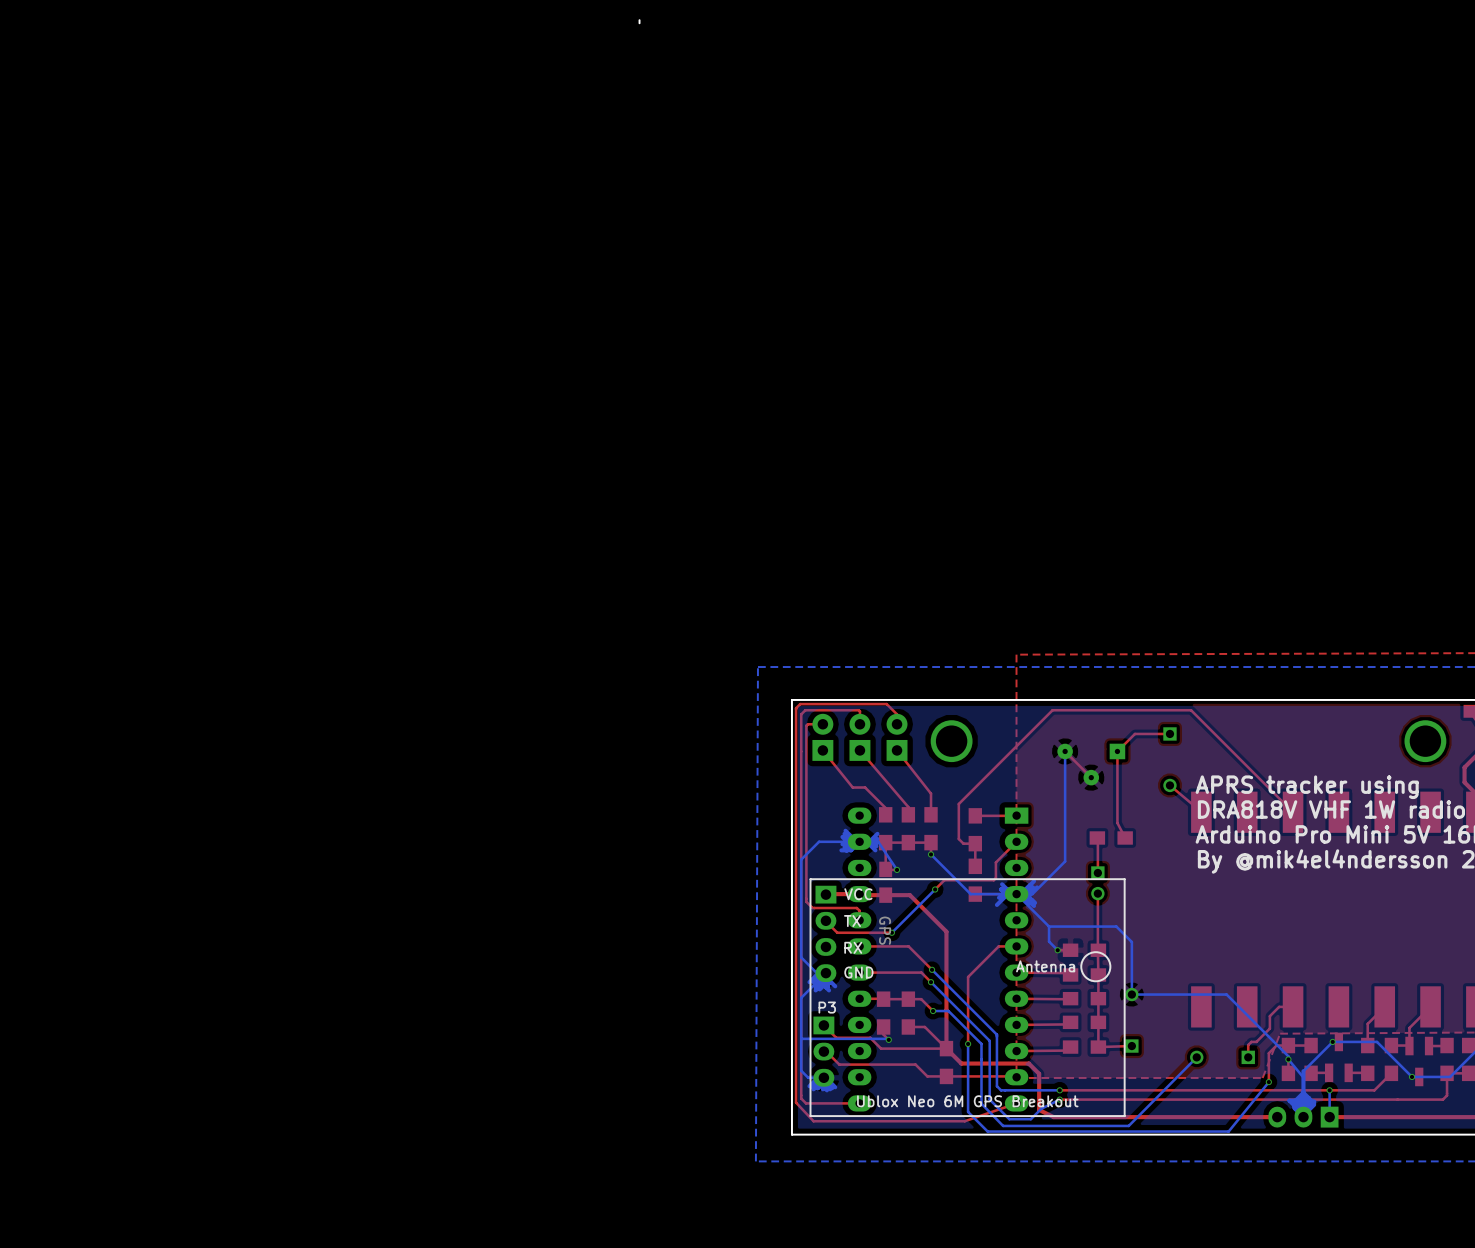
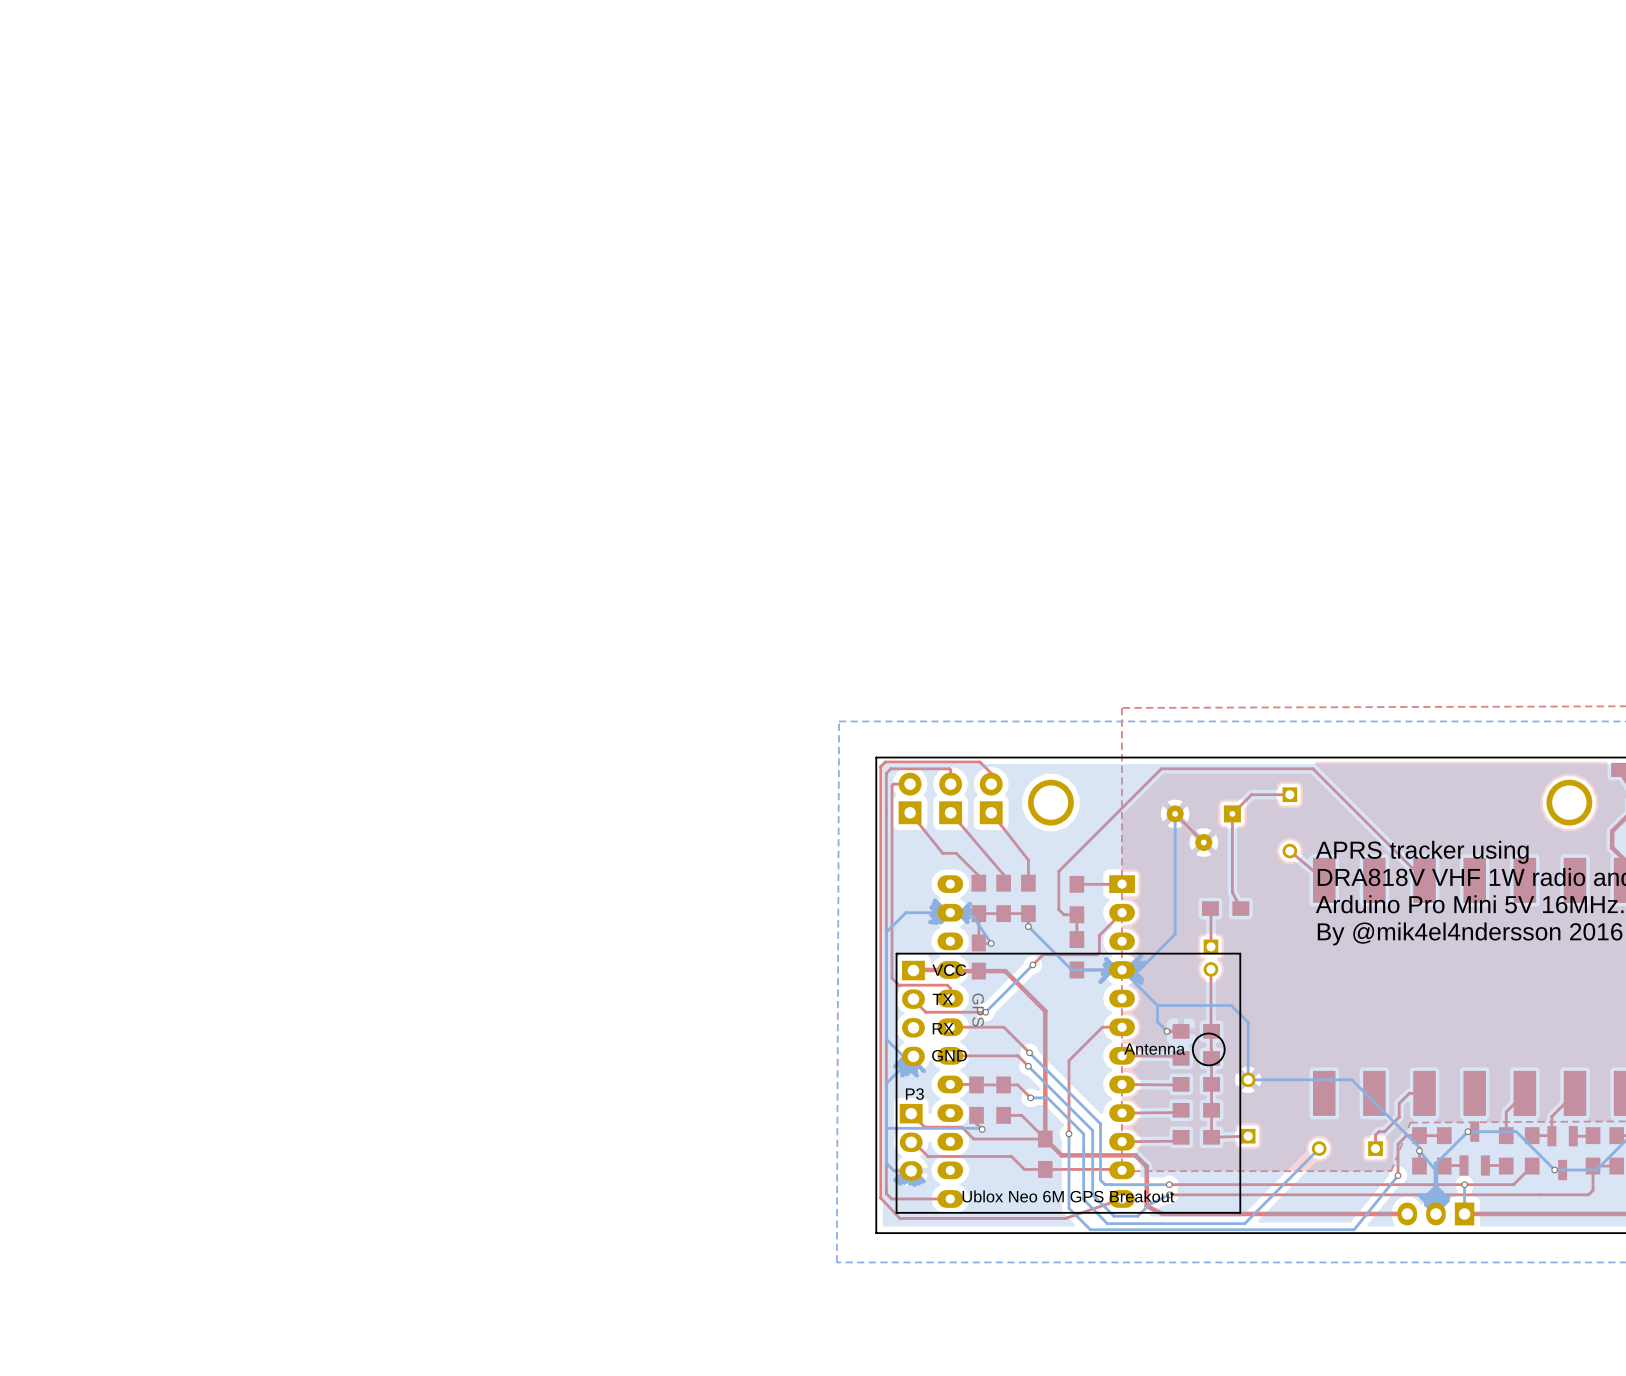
board edge: (639, 20) (639, 23) -> none

